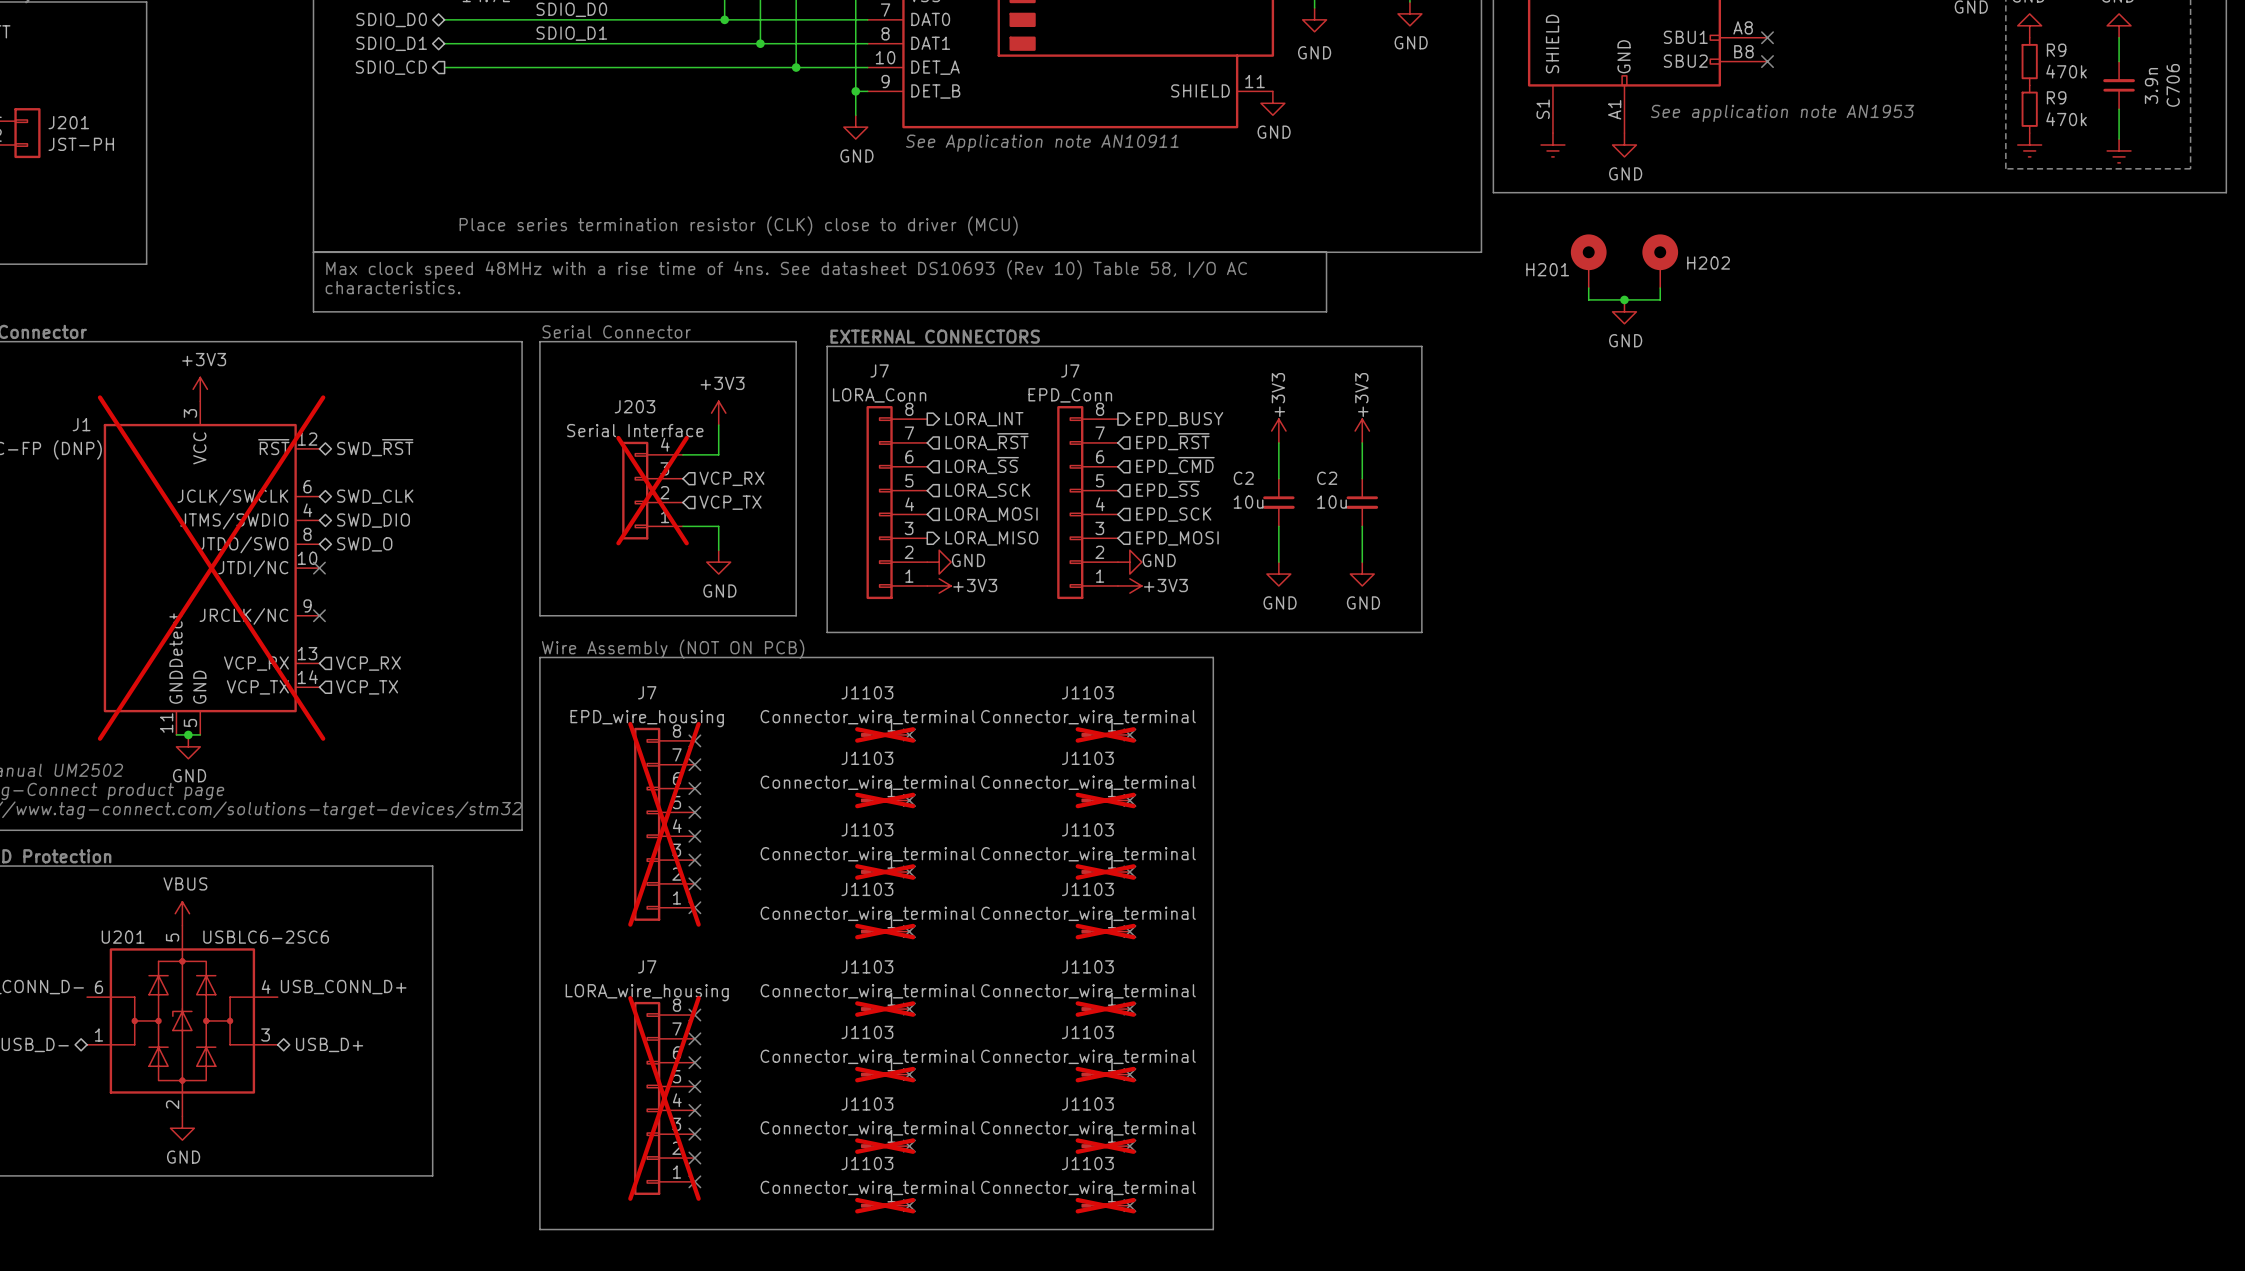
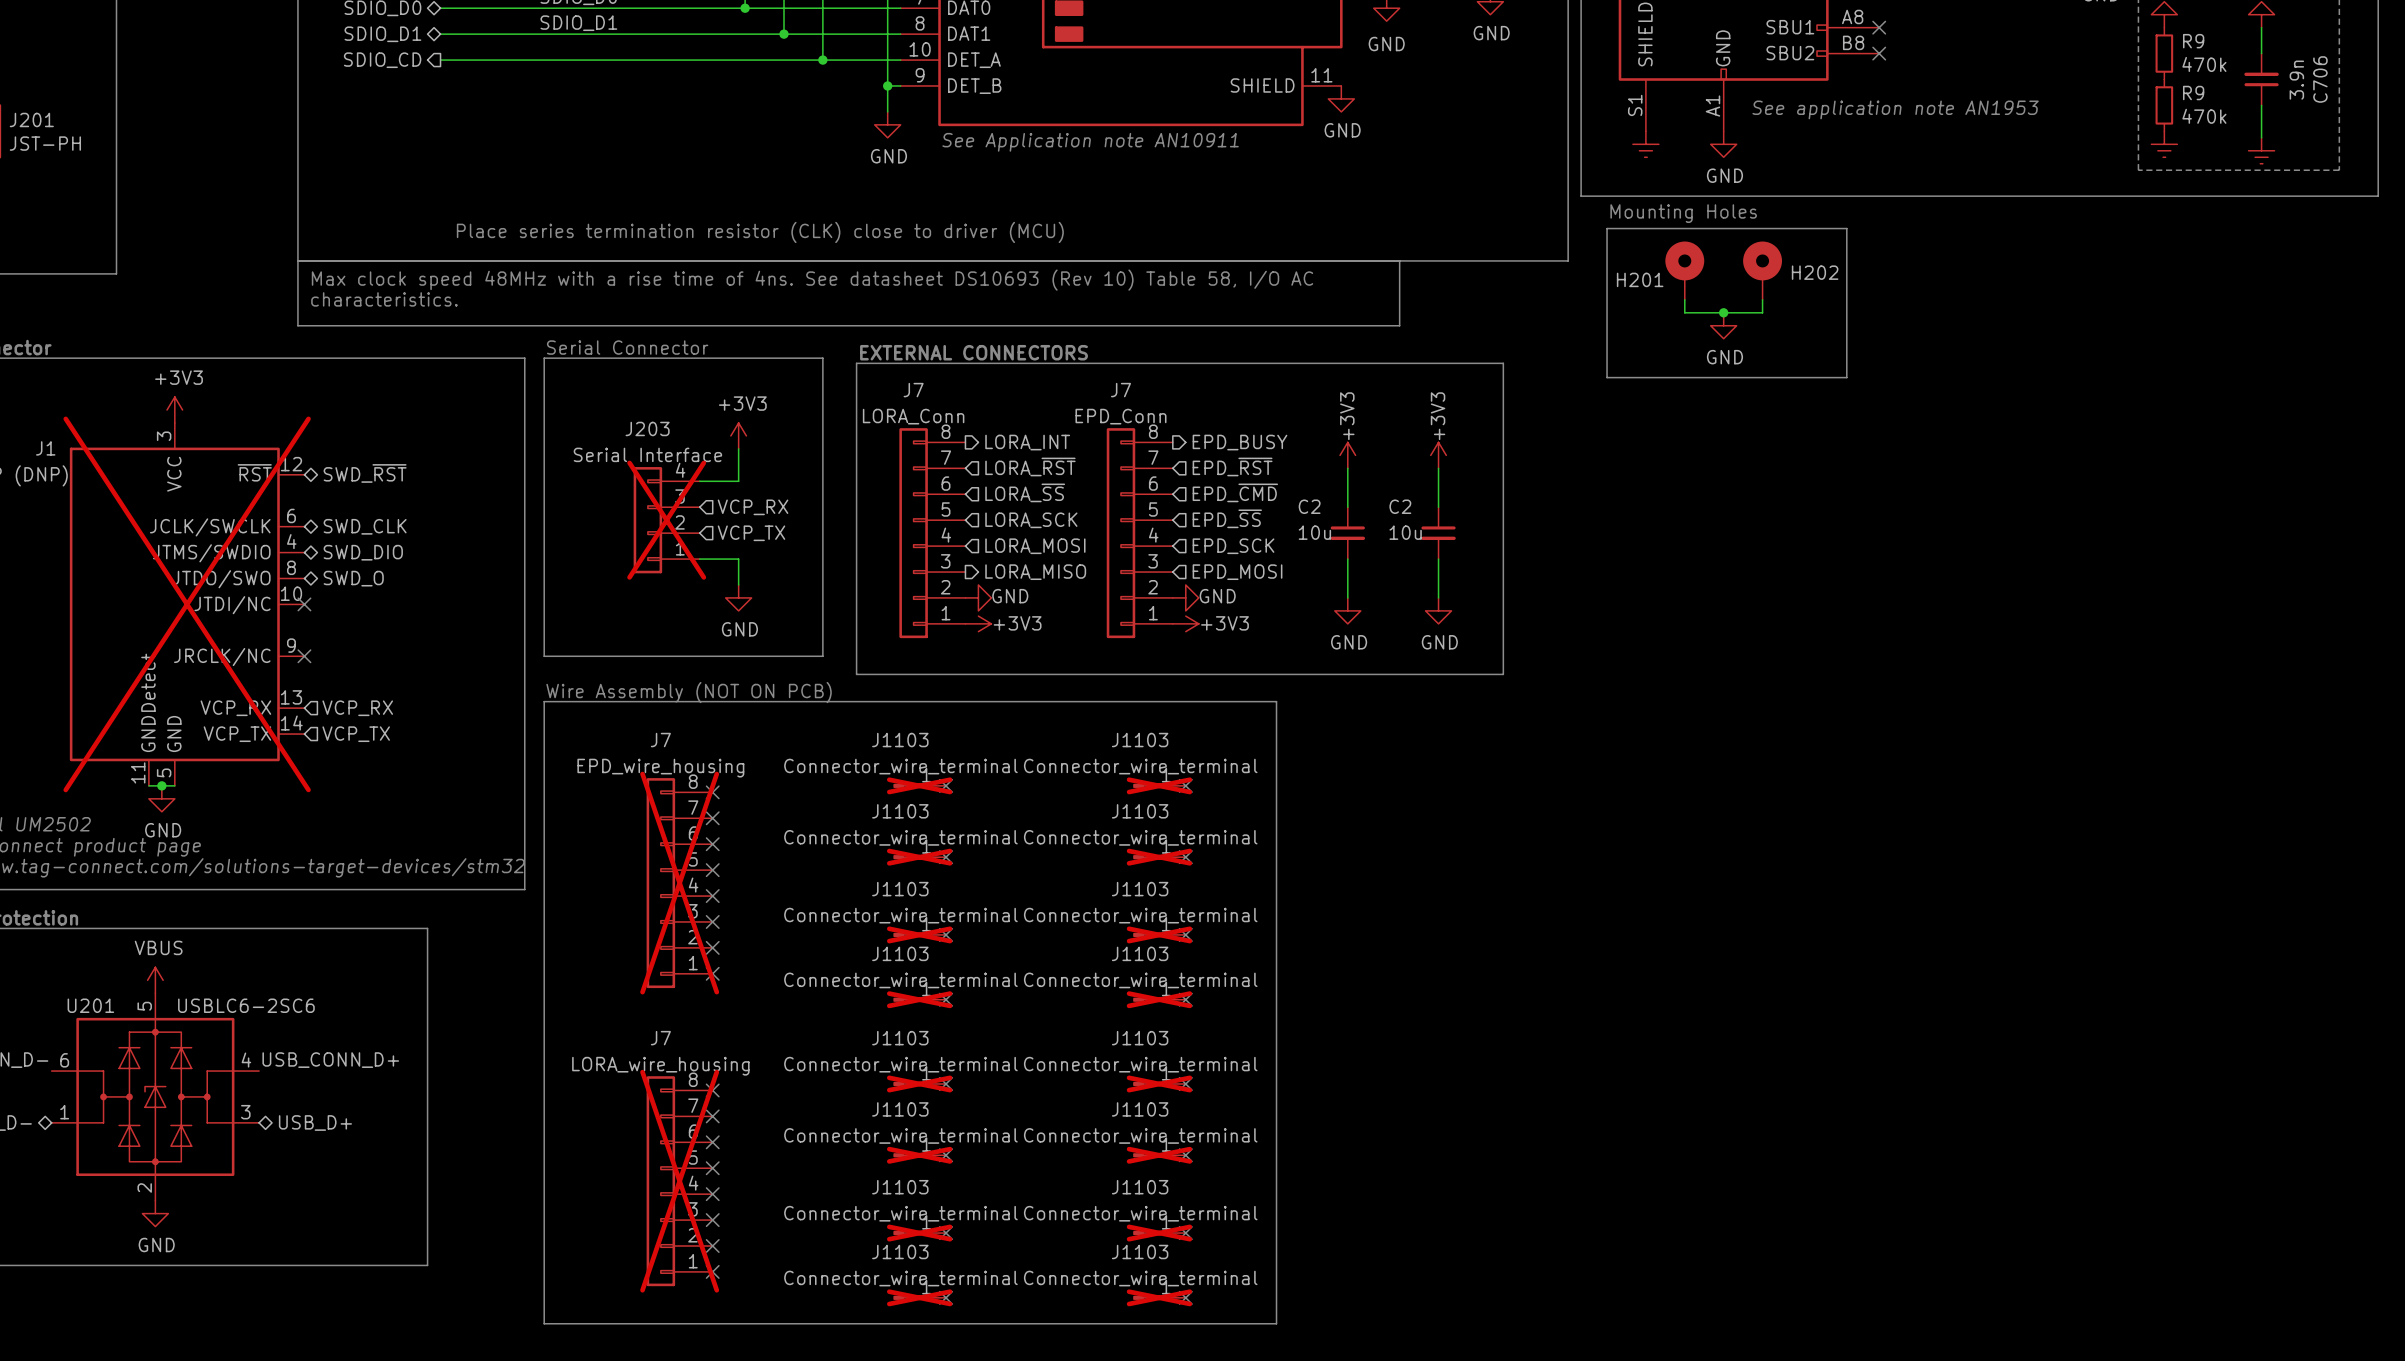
text: none -> Mounting Holes (1683, 213)
line: none -> (1607, 228) (1846, 228) (1846, 377) (1607, 377) (1607, 228)

